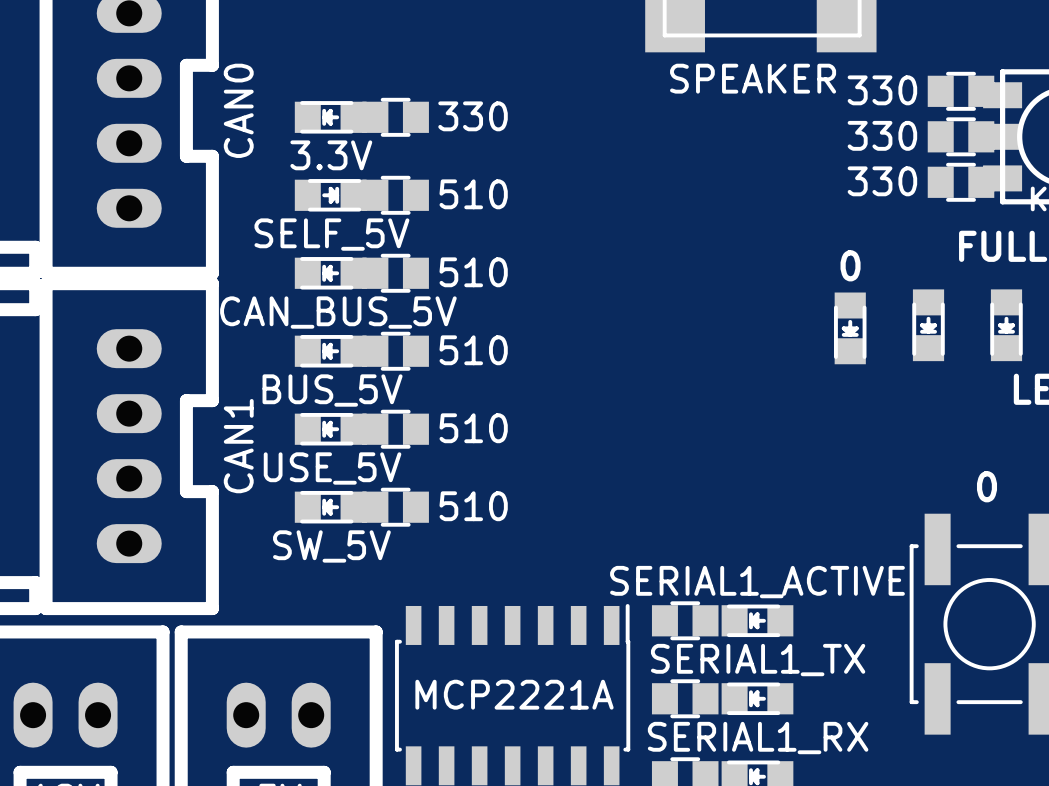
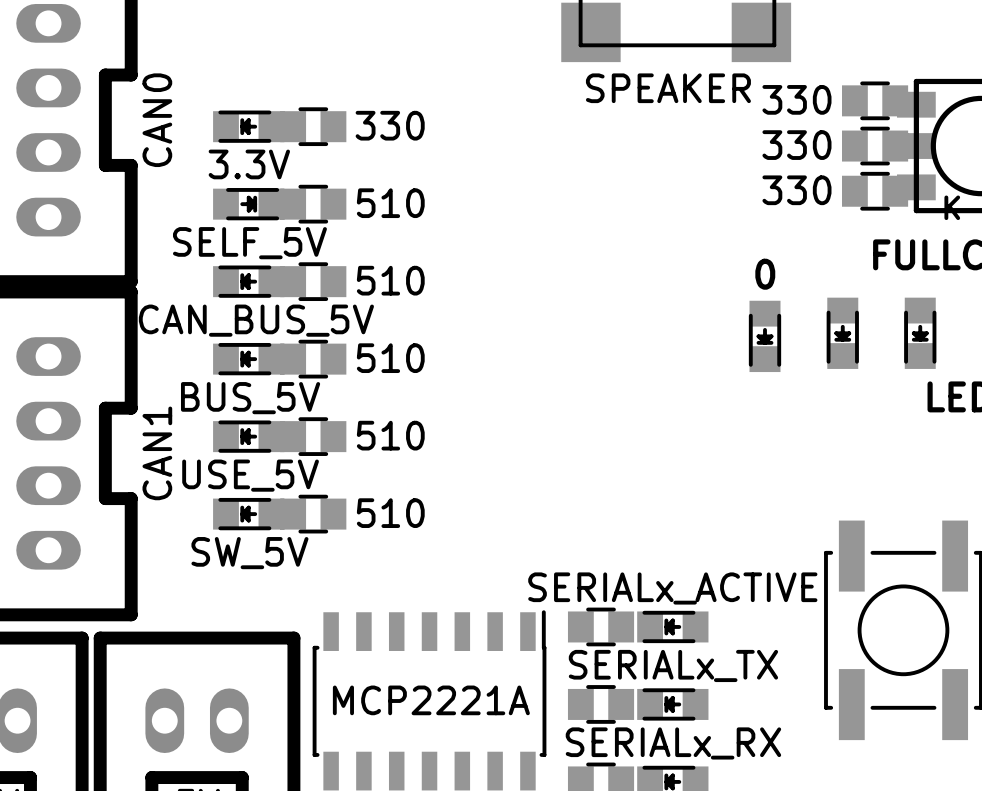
text: 0 (987, 486) -> none
part value: SERIAL1_ACTIVE (757, 582) -> SERIALx_ACTIVE (672, 588)
part value: SERIAL1_TX (758, 660) -> SERIALx_TX (673, 665)
part value: SERIAL1_RX (758, 738) -> SERIALx_RX (673, 743)

